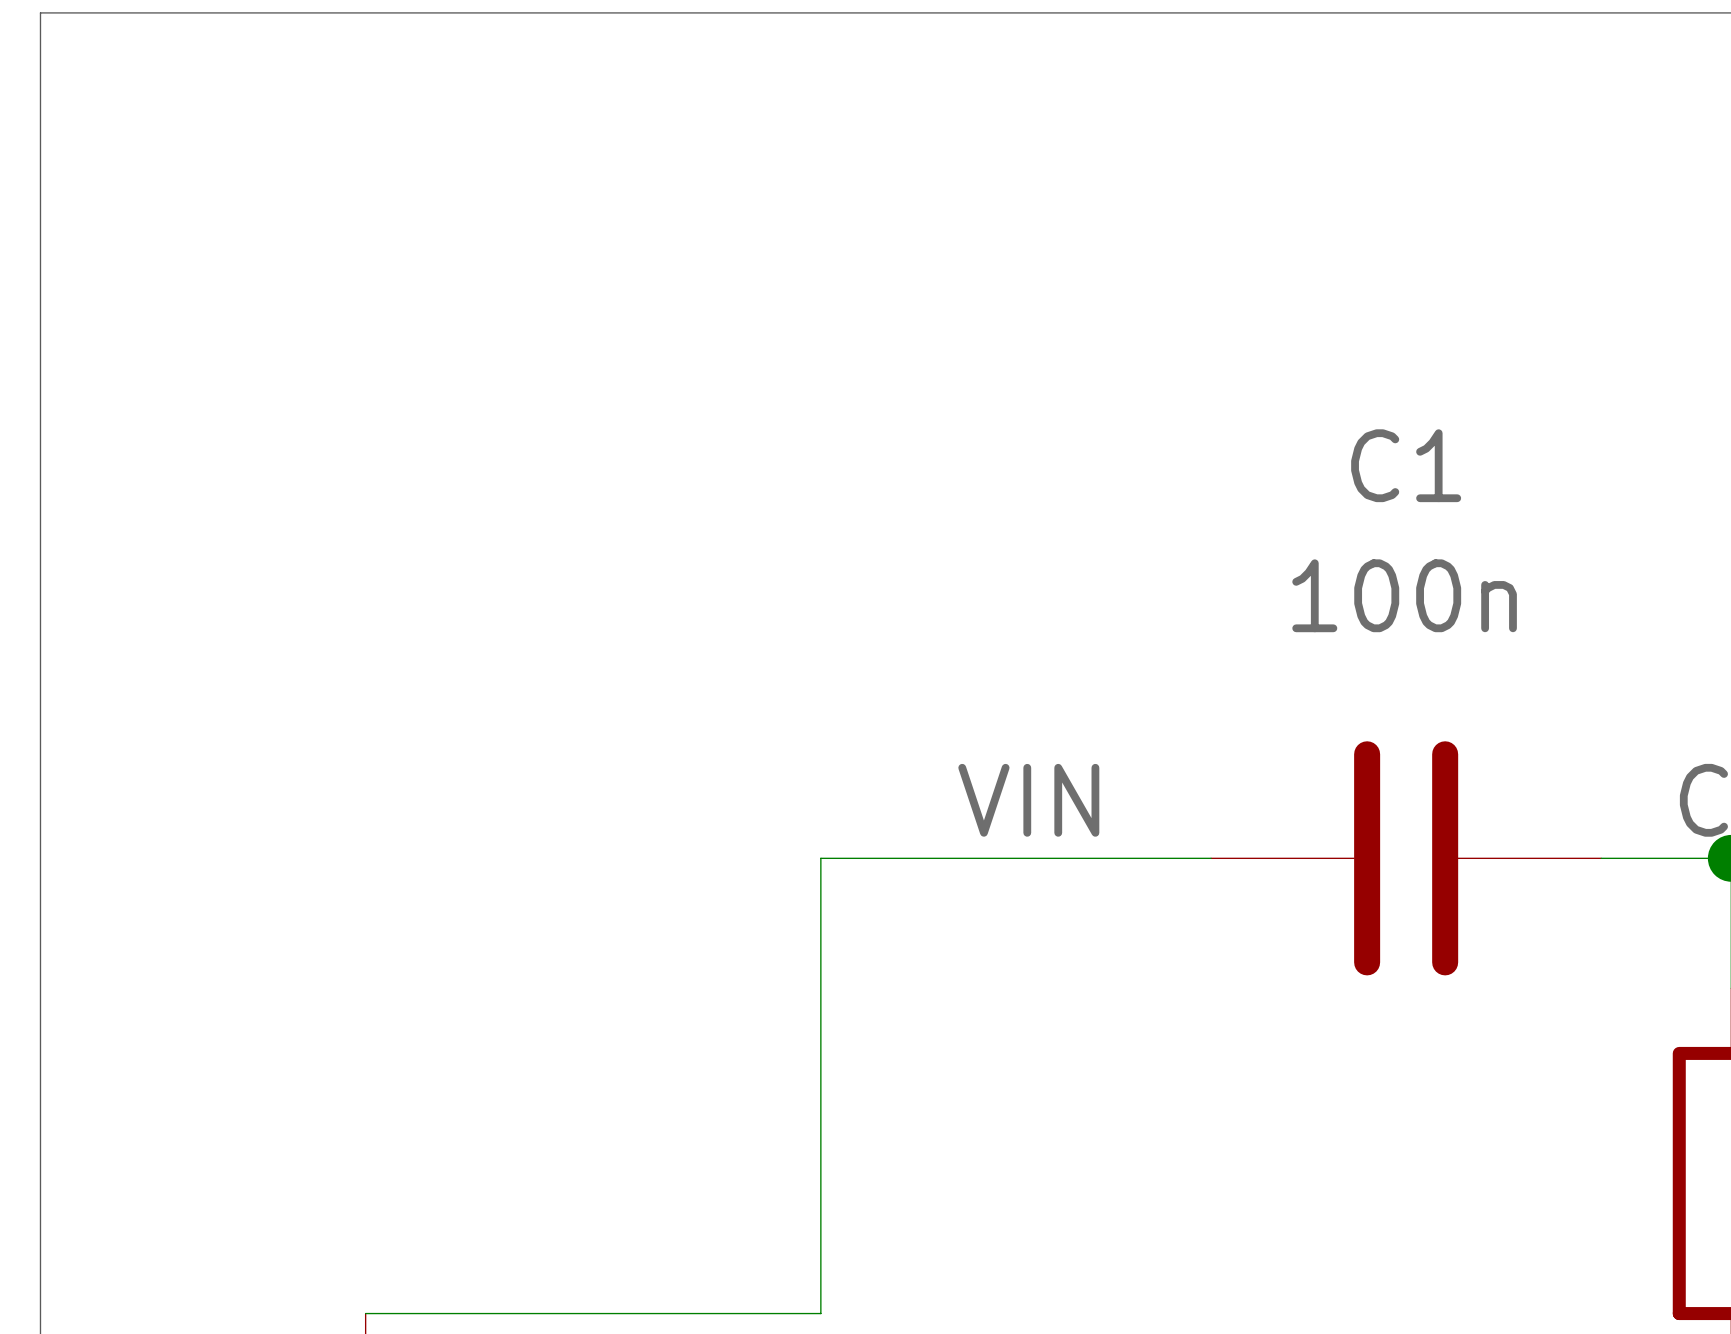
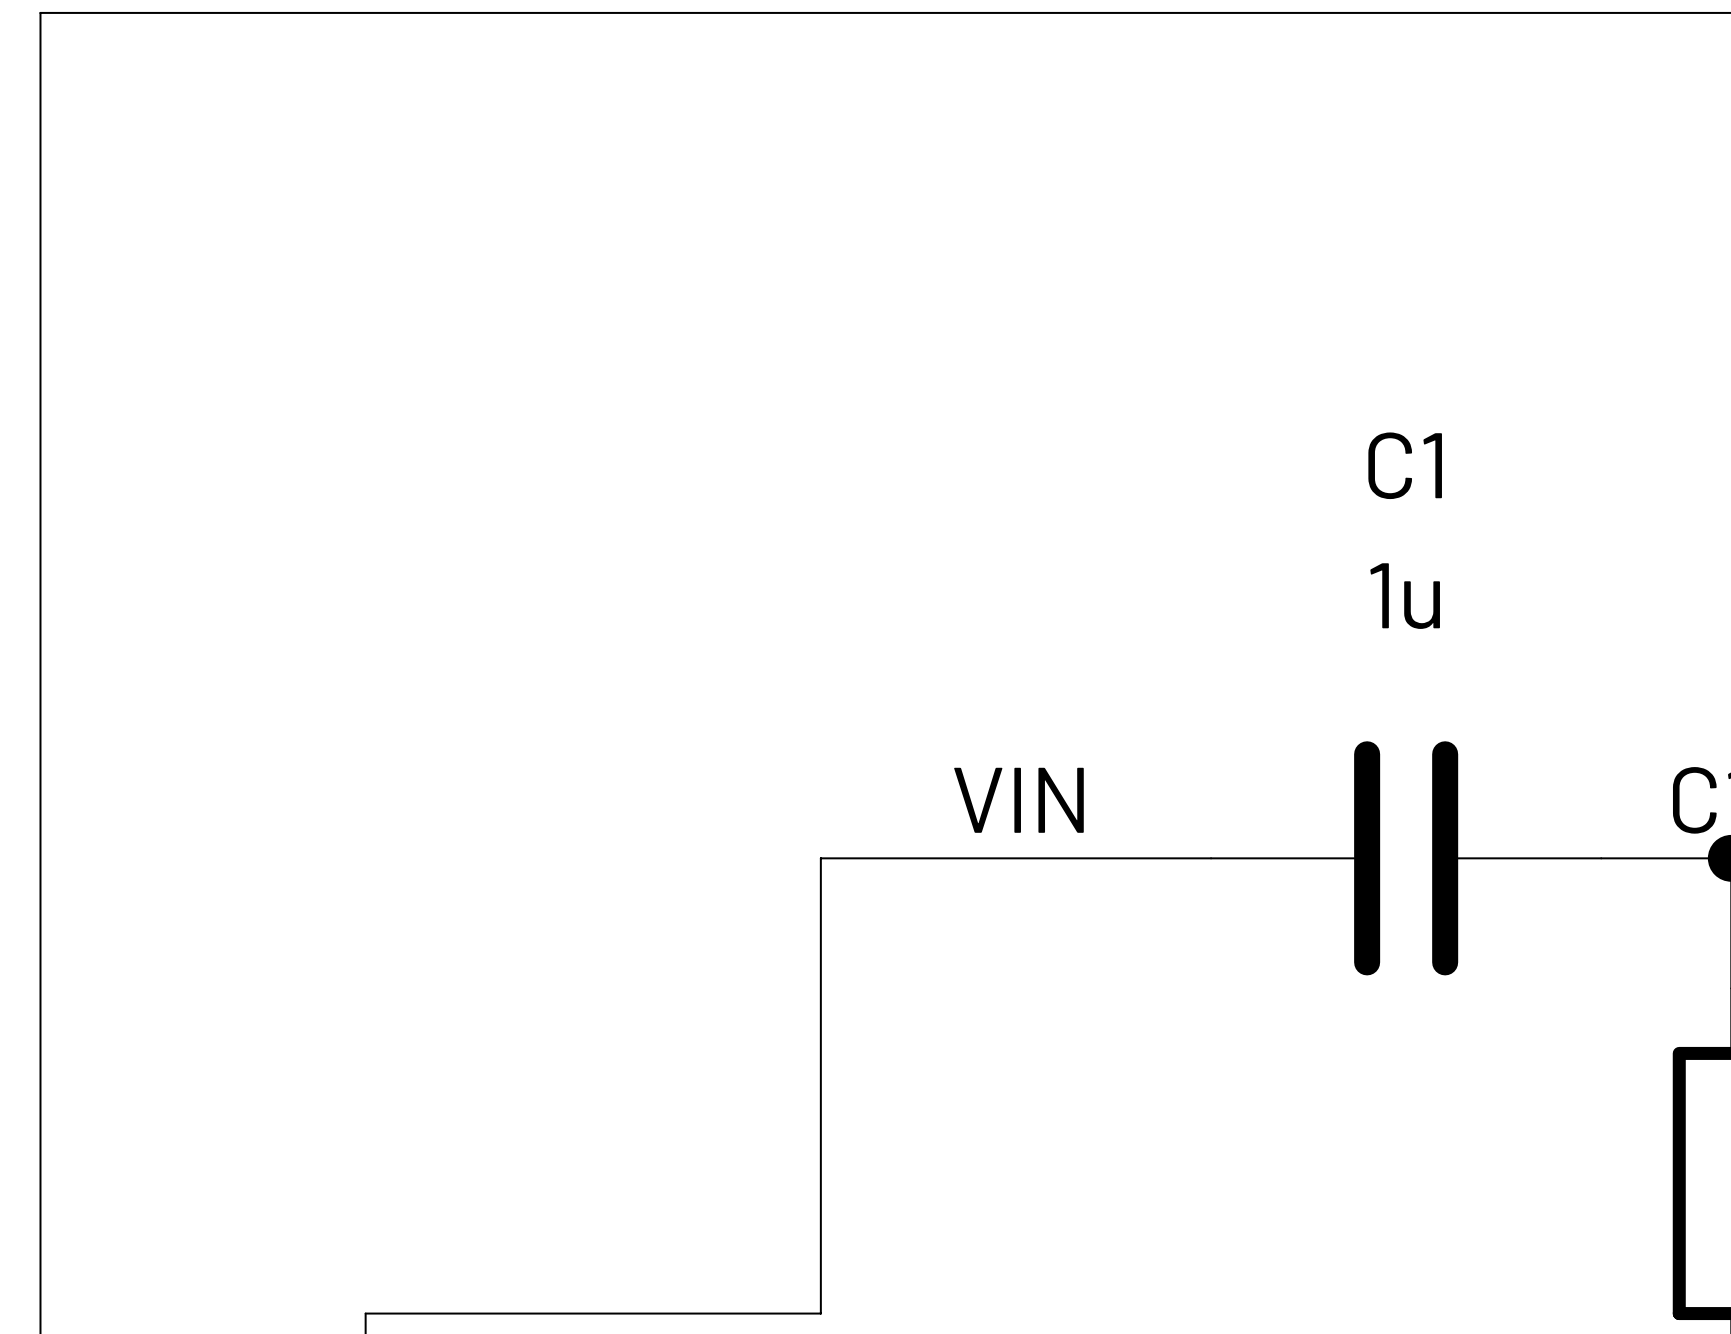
C1 value: 100n (1404, 595) -> 1u (1405, 596)

